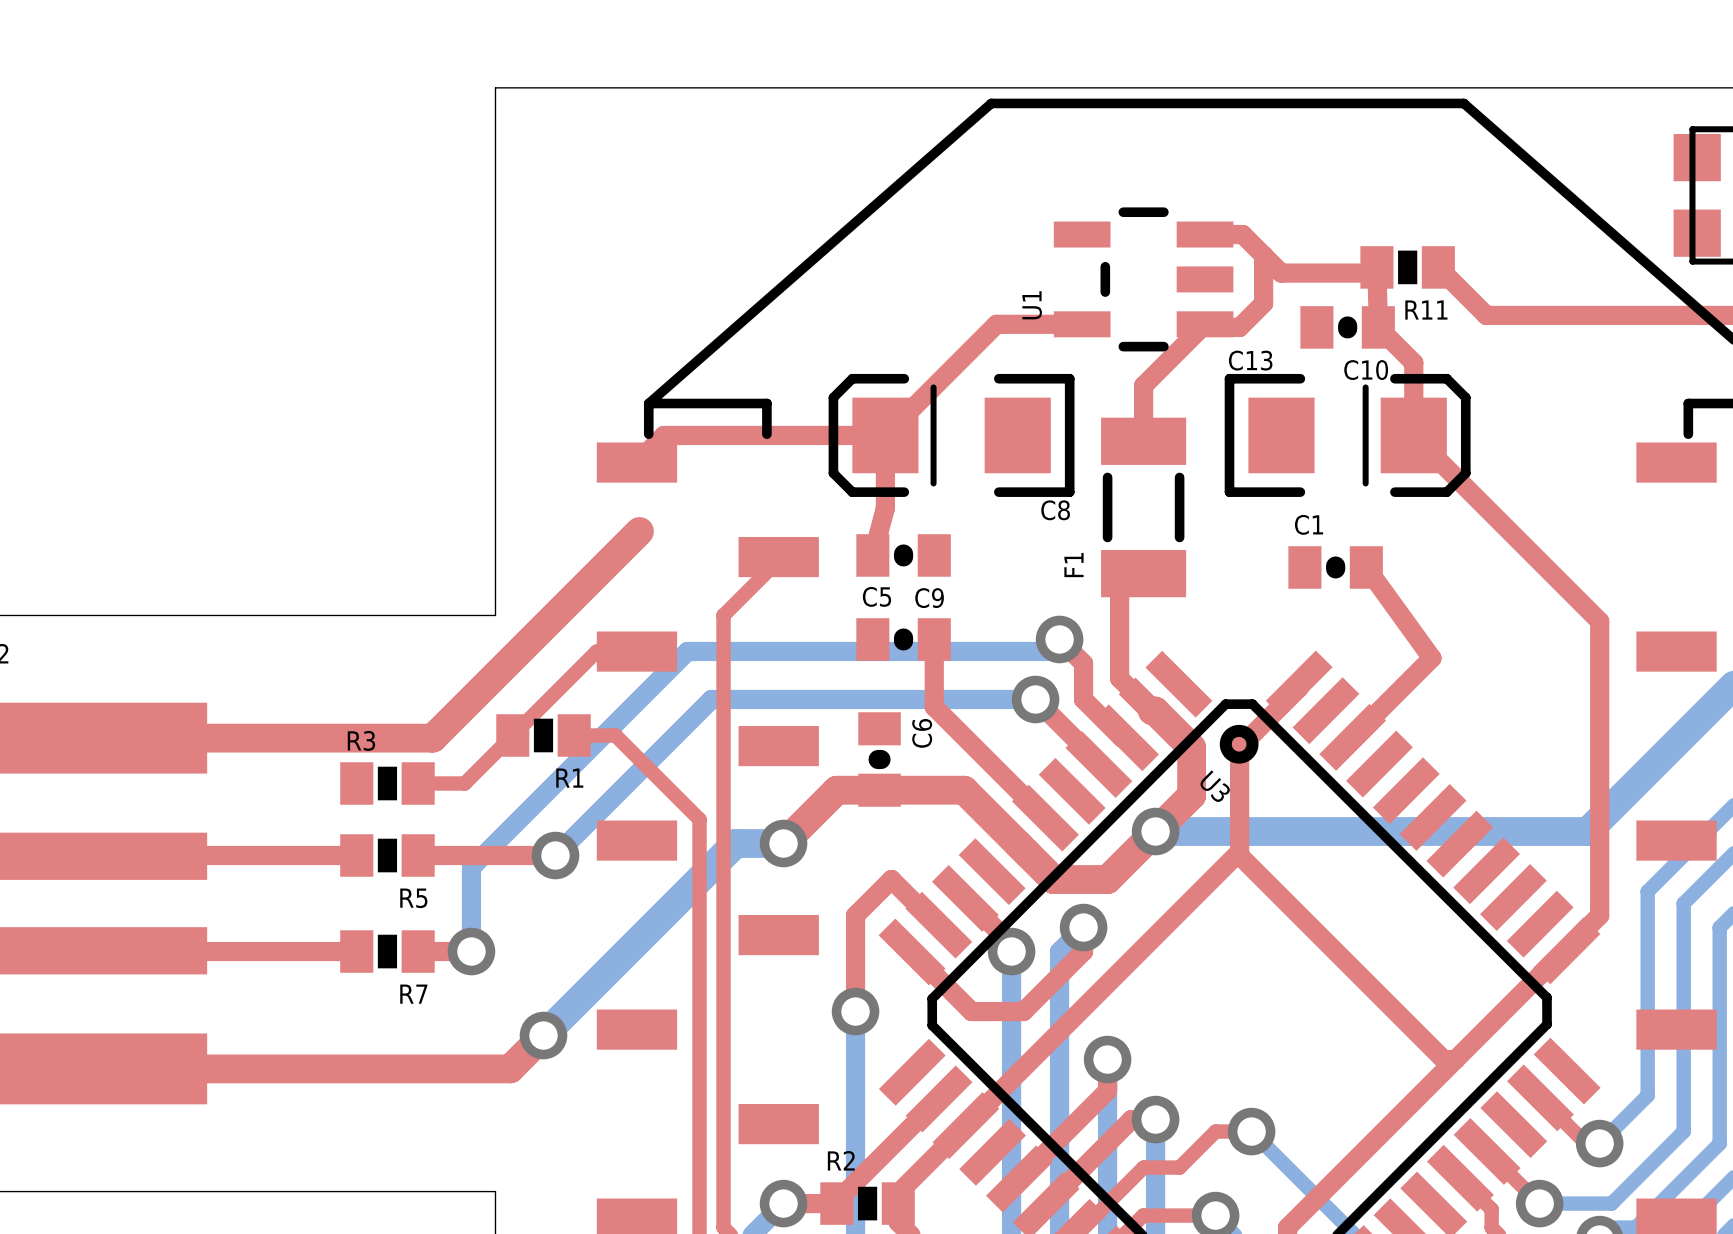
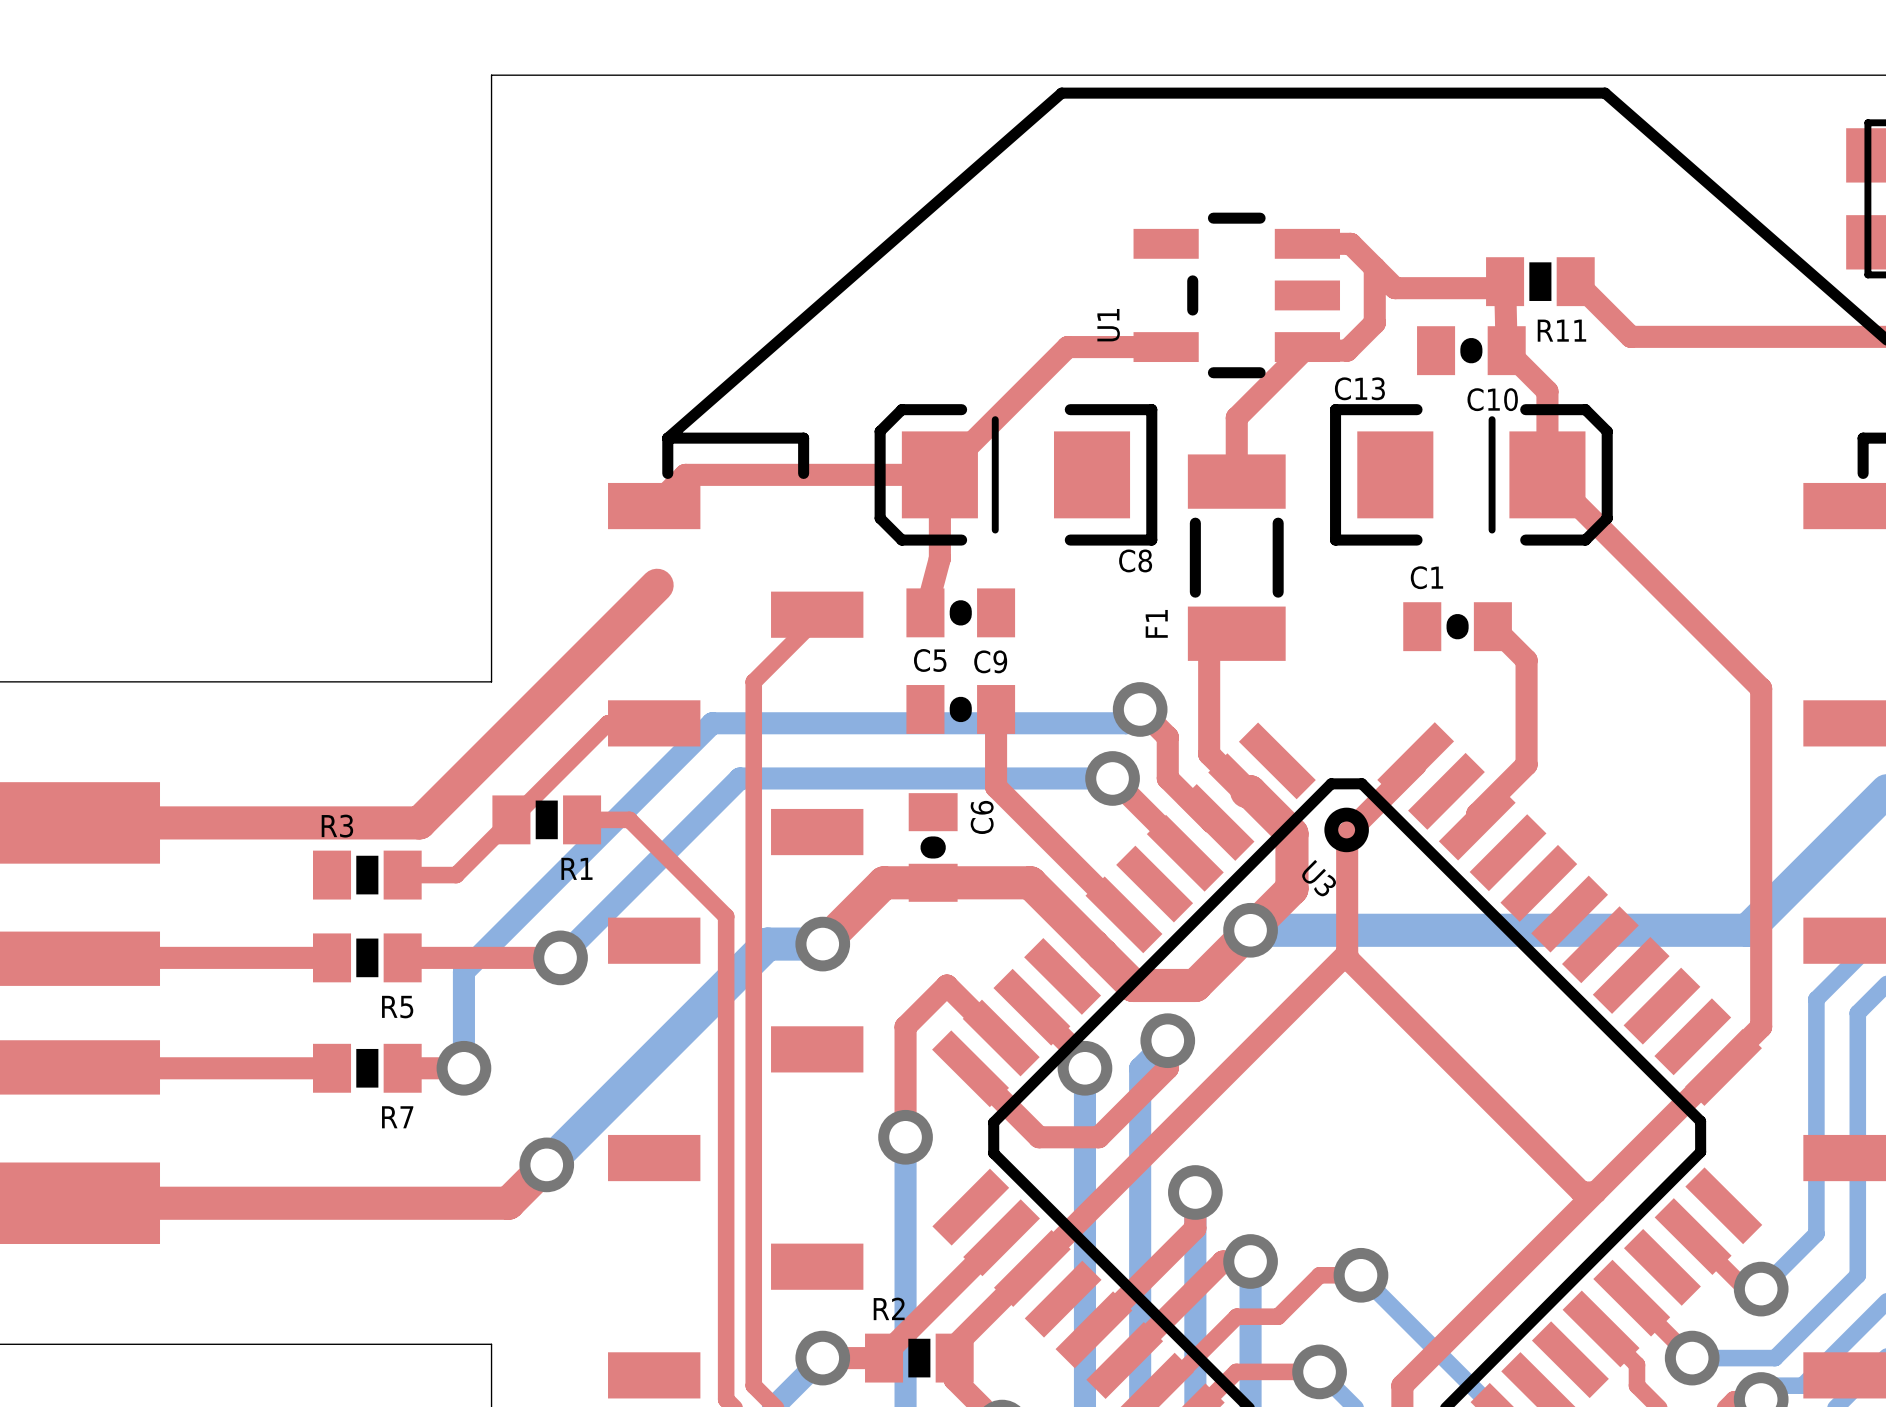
top track: (1366, 567) (1431, 658) (1352, 737) -> (1492, 626) (1526, 660) (1526, 764) (1477, 814) (1477, 822)

